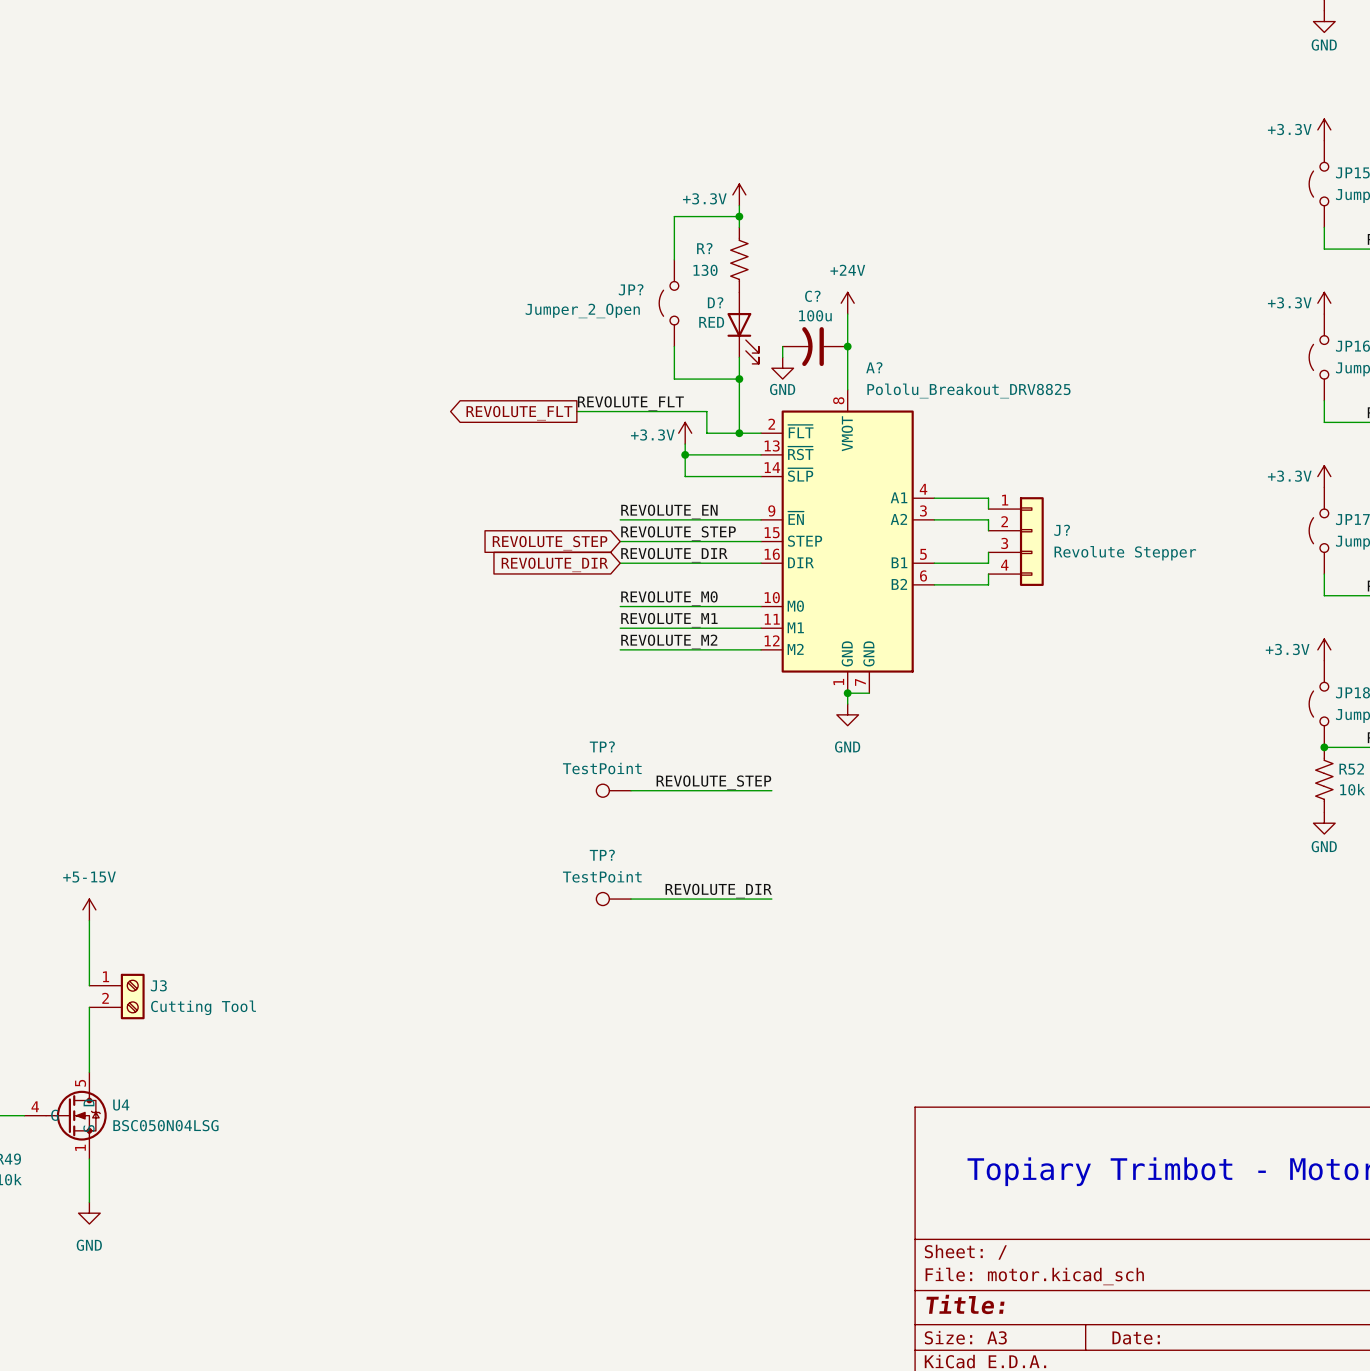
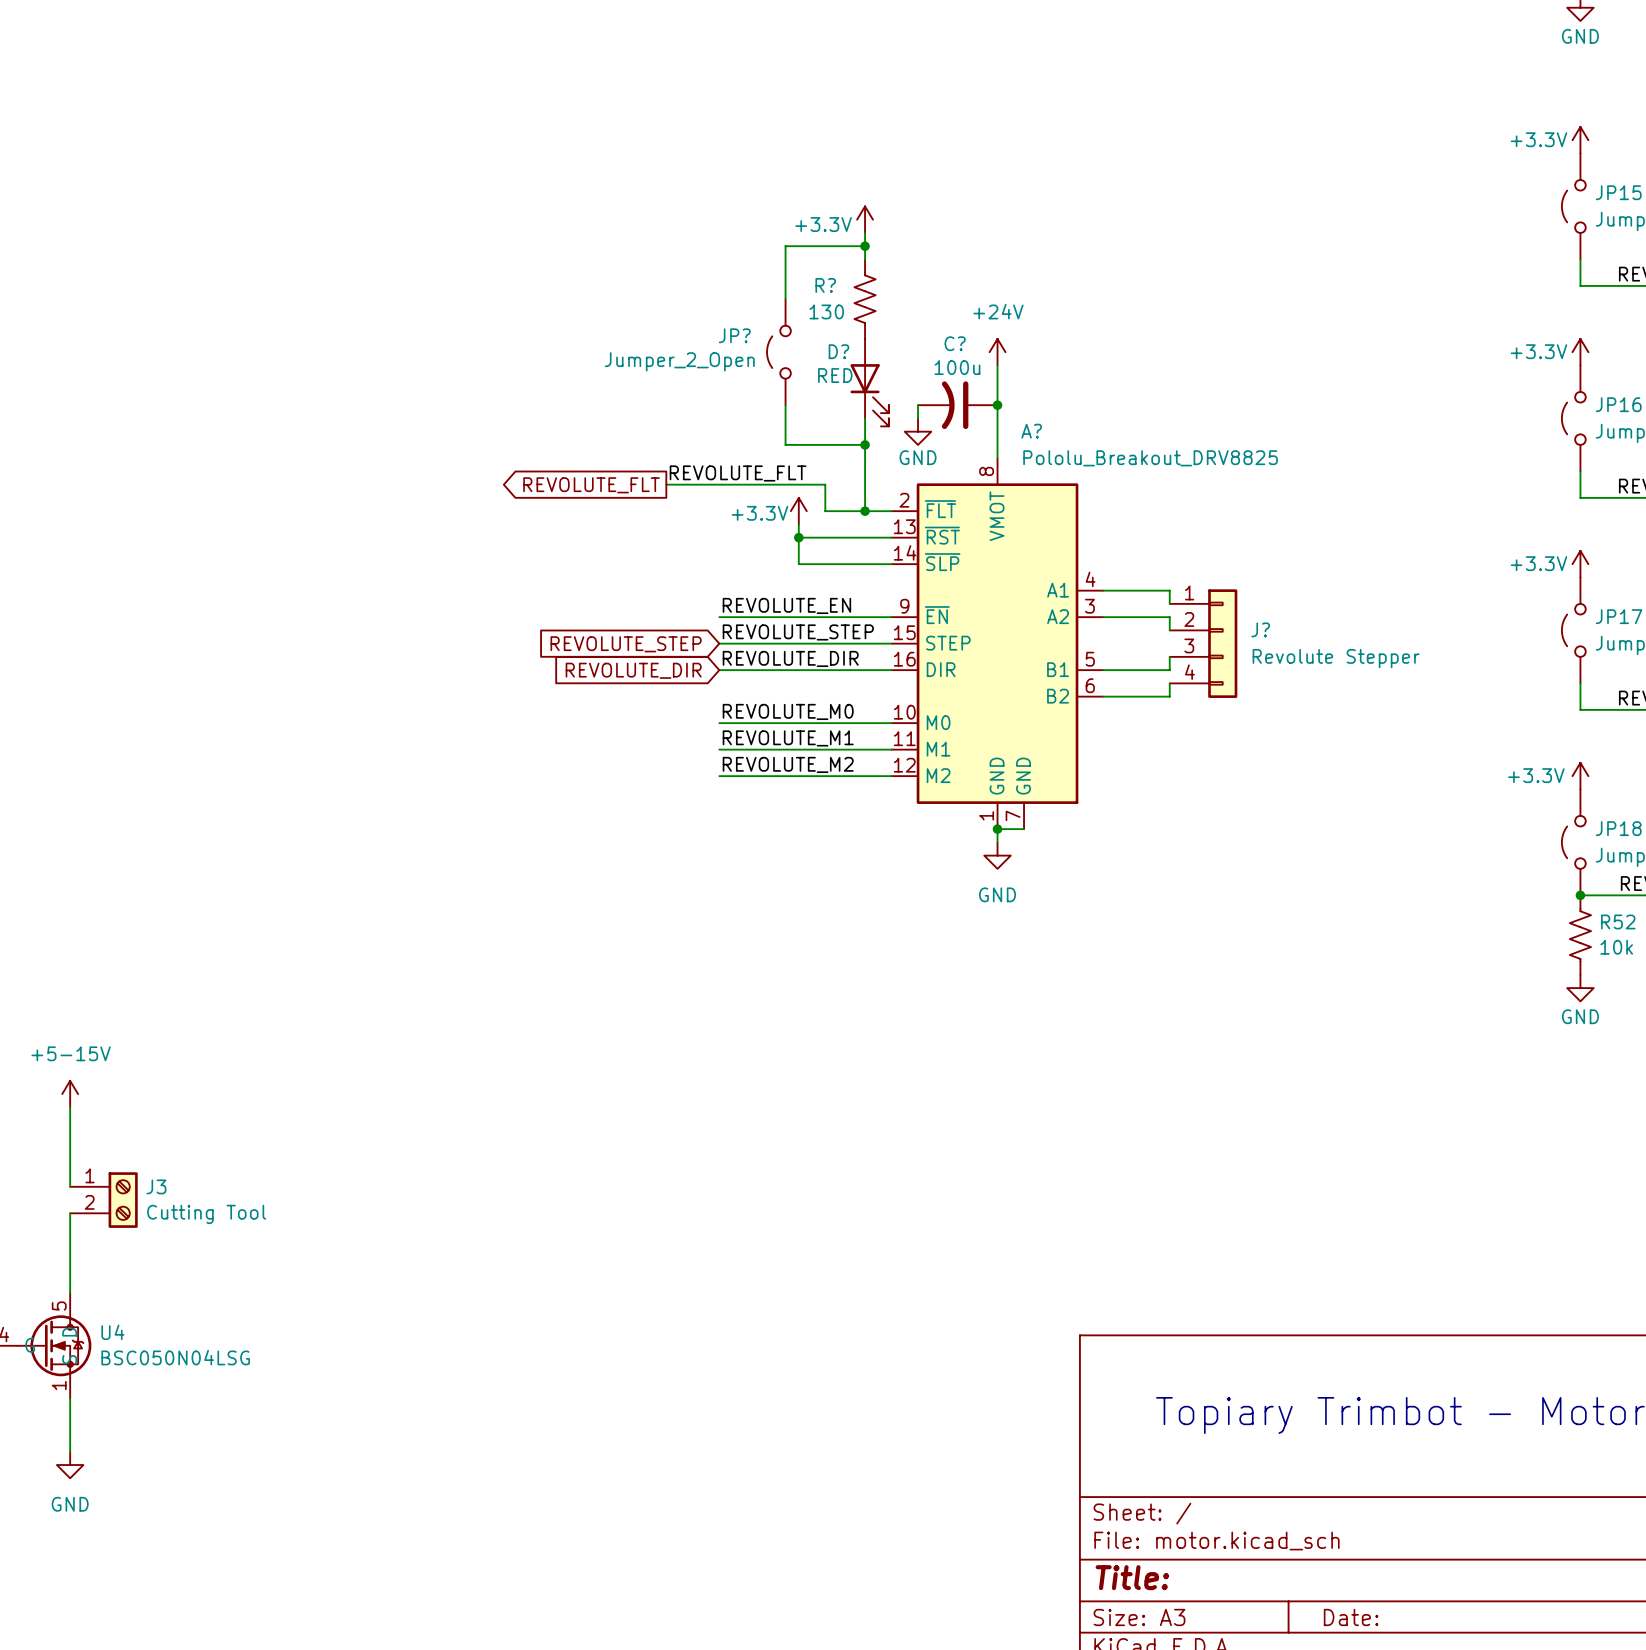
label: REVOLUTE_STEP (713, 782) -> none
TP?: TestPoint (613, 790) -> none
wire: (631, 790) (771, 790) -> none
label: REVOLUTE_DIR (718, 891) -> none
TP?: TestPoint (613, 899) -> none
wire: (631, 899) (771, 899) -> none

